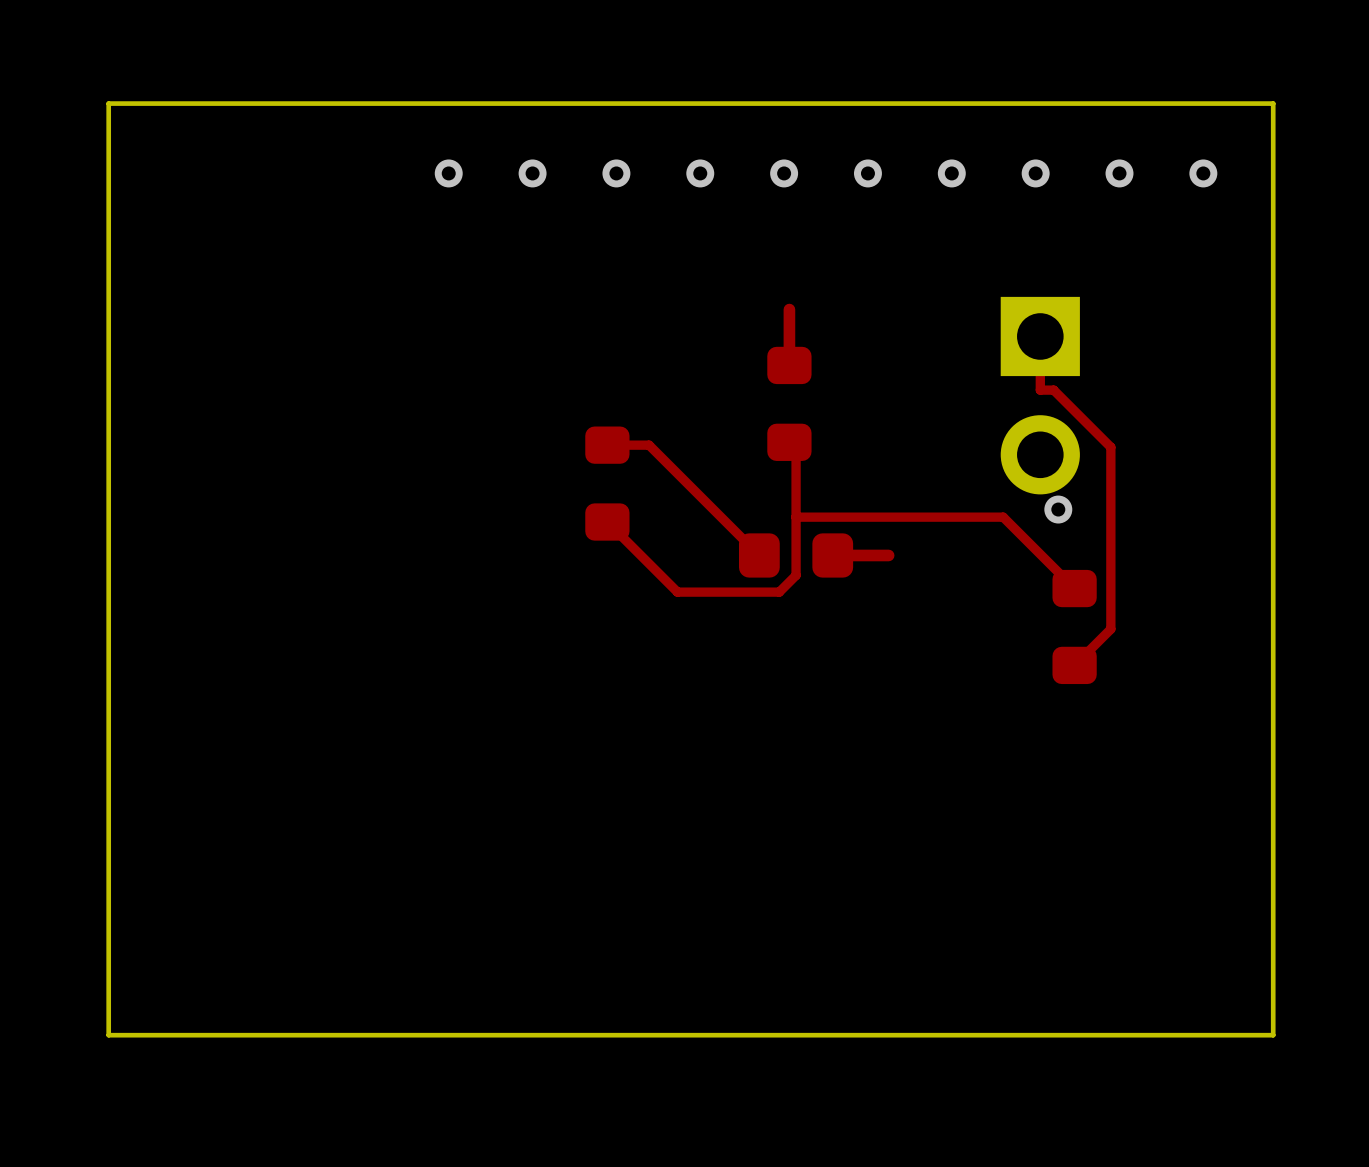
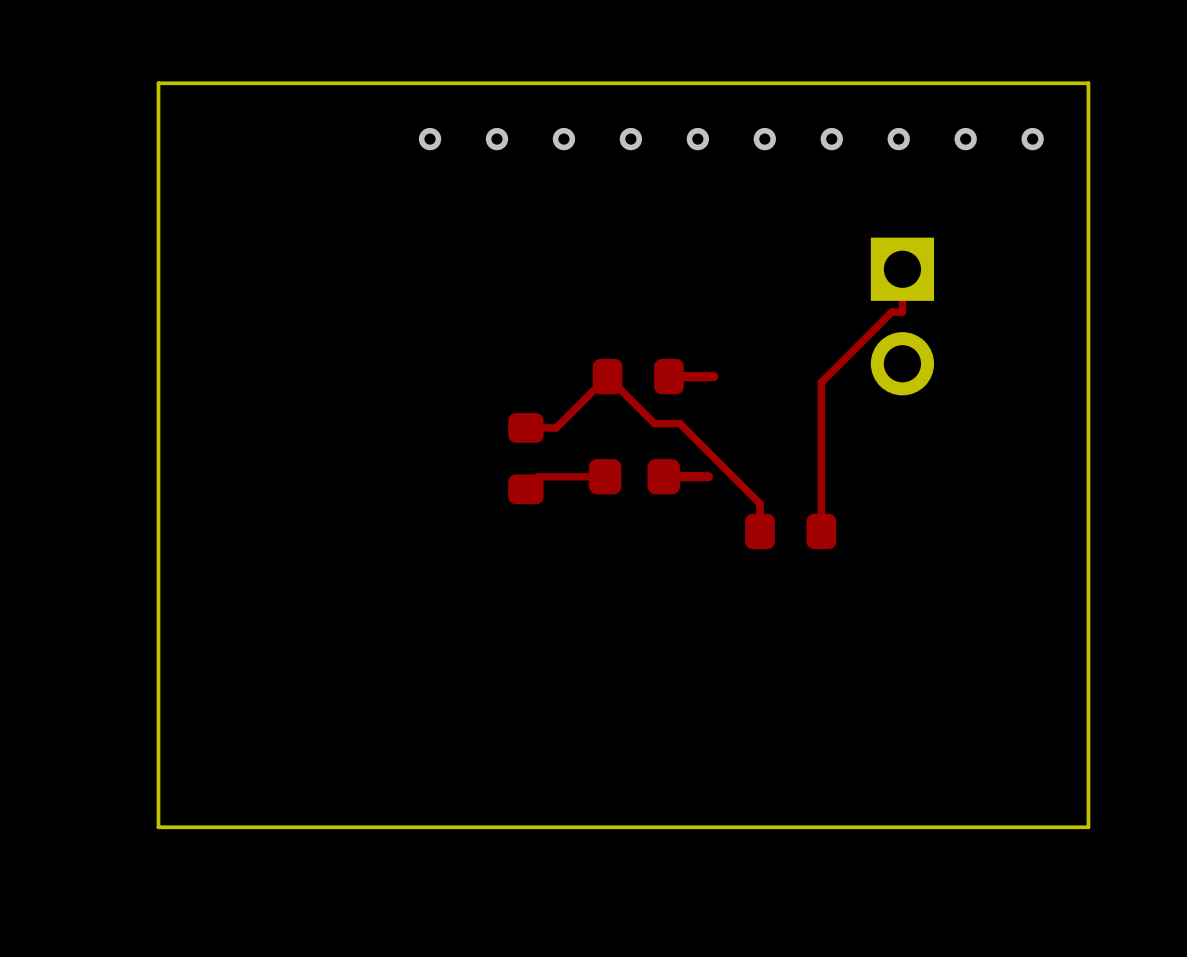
top track: (789, 309) (789, 365) -> none
top track: (1040, 390) (1053, 390) (1110, 447) (1110, 629) (1074, 665) -> (902, 312) (891, 312) (821, 382) (821, 531)
part: (789, 403) -> none
top track: (789, 442) (796, 442) (796, 575) (779, 592) (677, 592) (607, 522) -> none
top track: (607, 445) (649, 445) (759, 555) -> none
part: none -> (638, 376)
top track: none -> (713, 376) (668, 376)
part: (607, 483) -> none
via: (1058, 509) -> none
top track: (796, 517) (1003, 517) (1074, 588) -> none
top track: none -> (525, 427) (556, 427) (607, 376) (654, 423) (679, 423) (760, 503) (760, 531)
part position: (796, 555) -> (634, 476)
top track: (888, 555) (832, 555) -> (708, 476) (663, 476)
part: none -> (525, 458)
top track: none -> (605, 476) (538, 476) (525, 489)
part: (1074, 626) -> none
part: none -> (790, 531)

